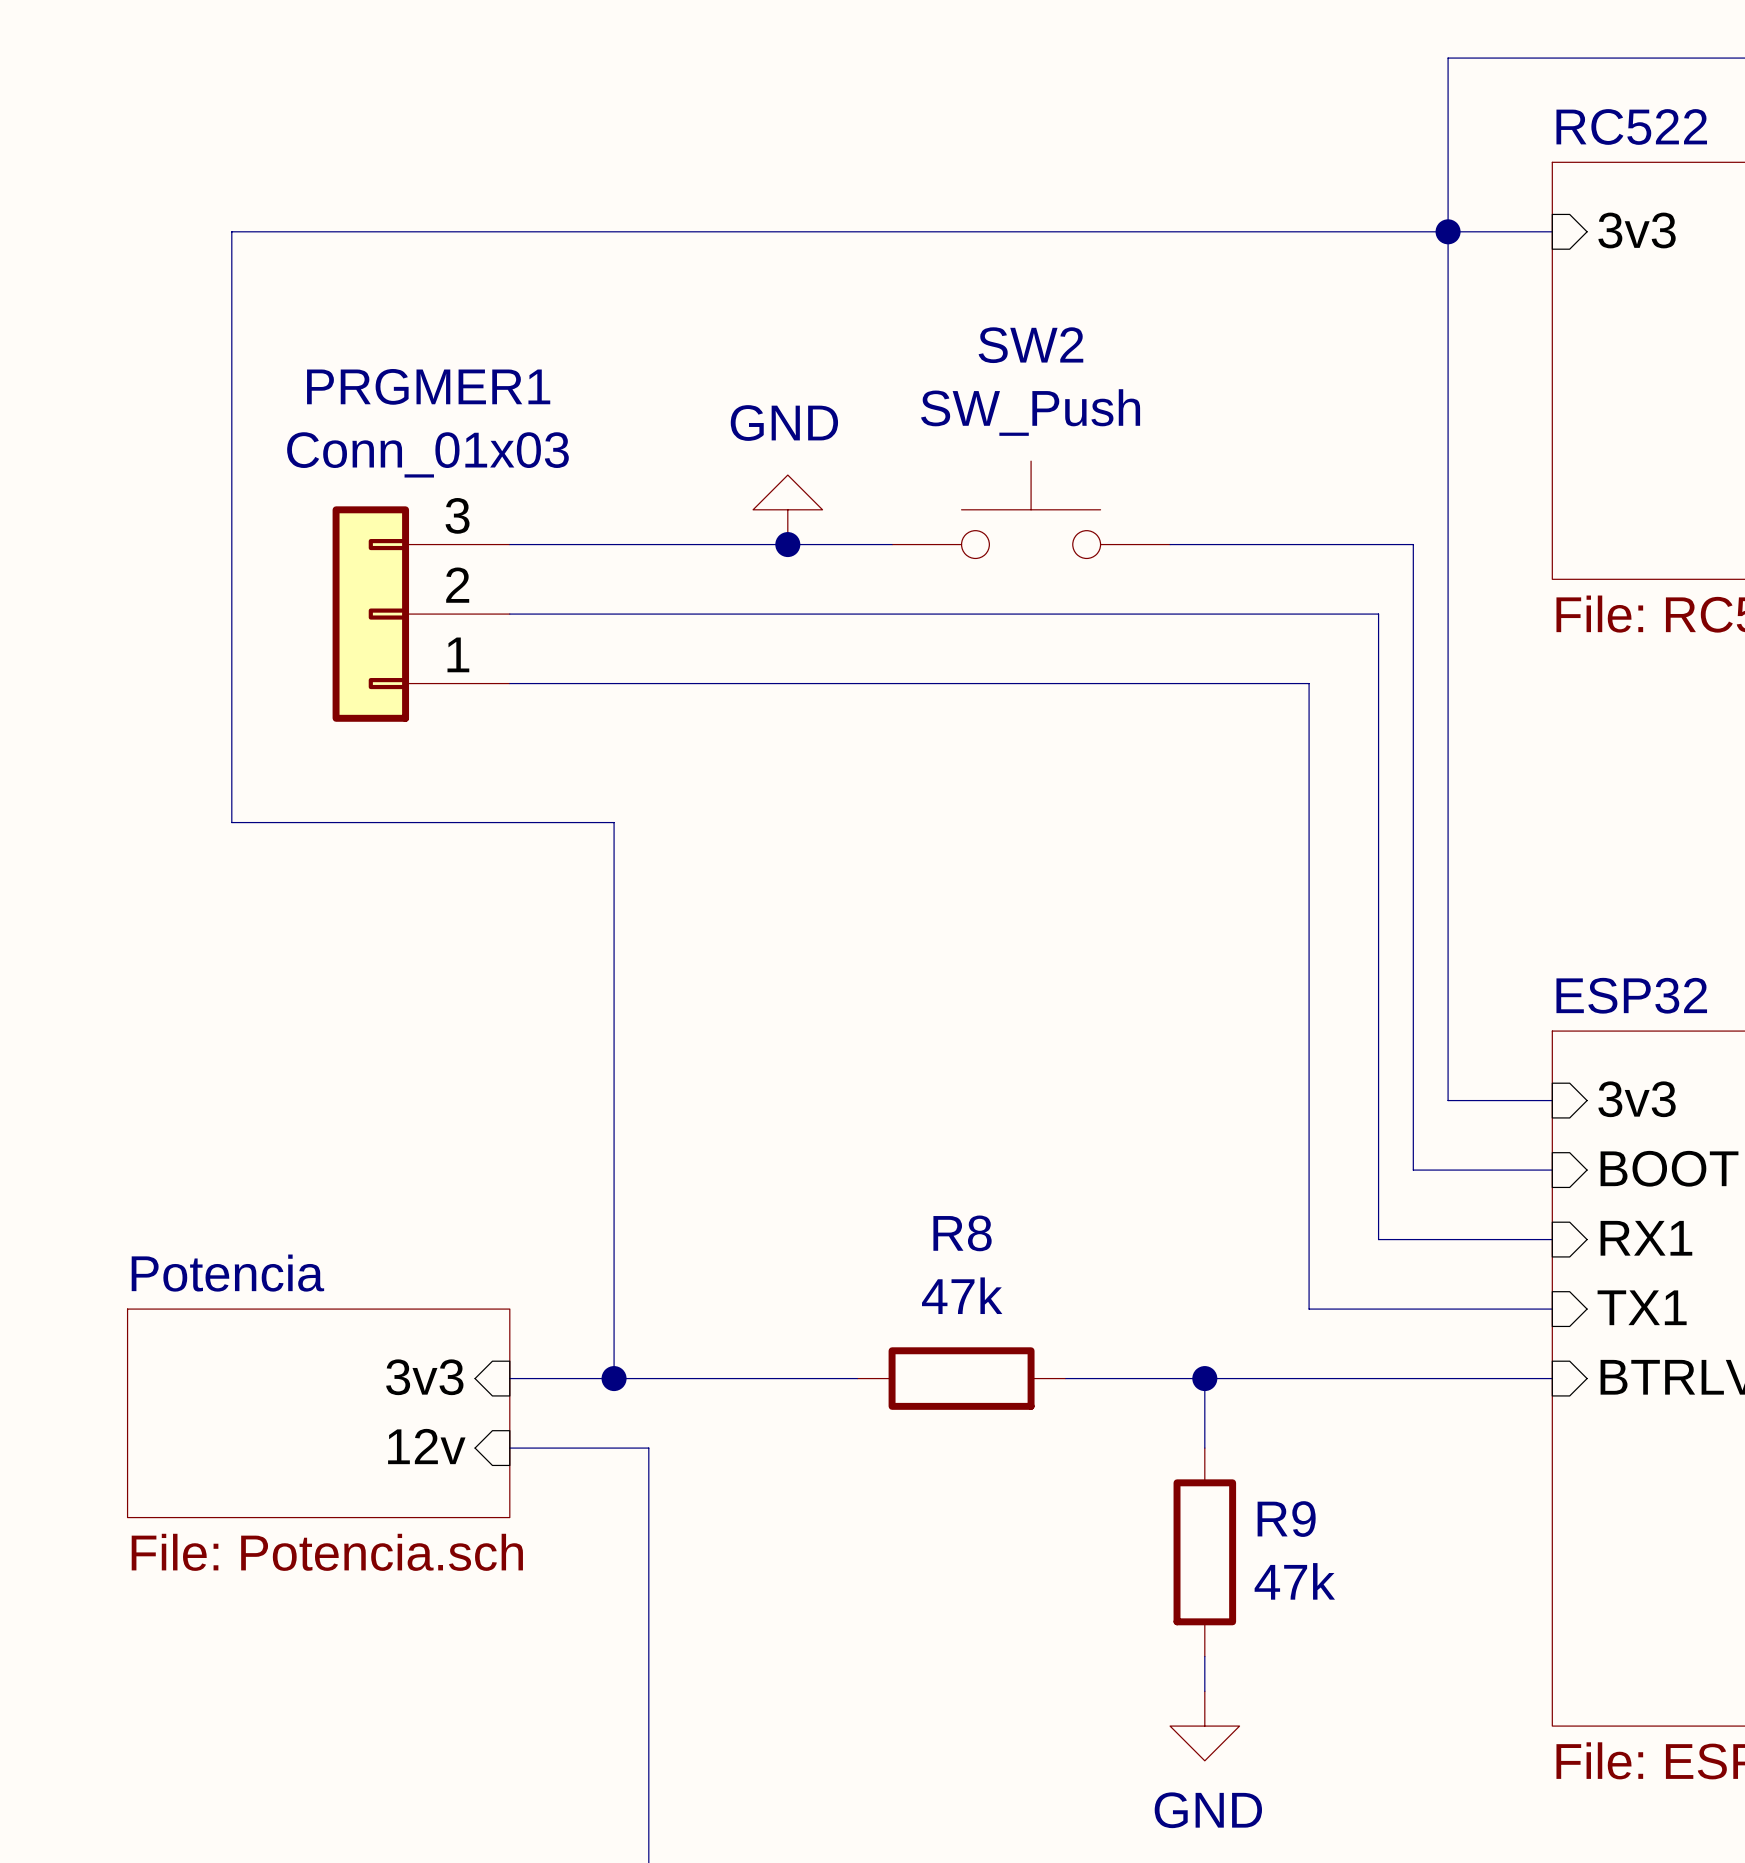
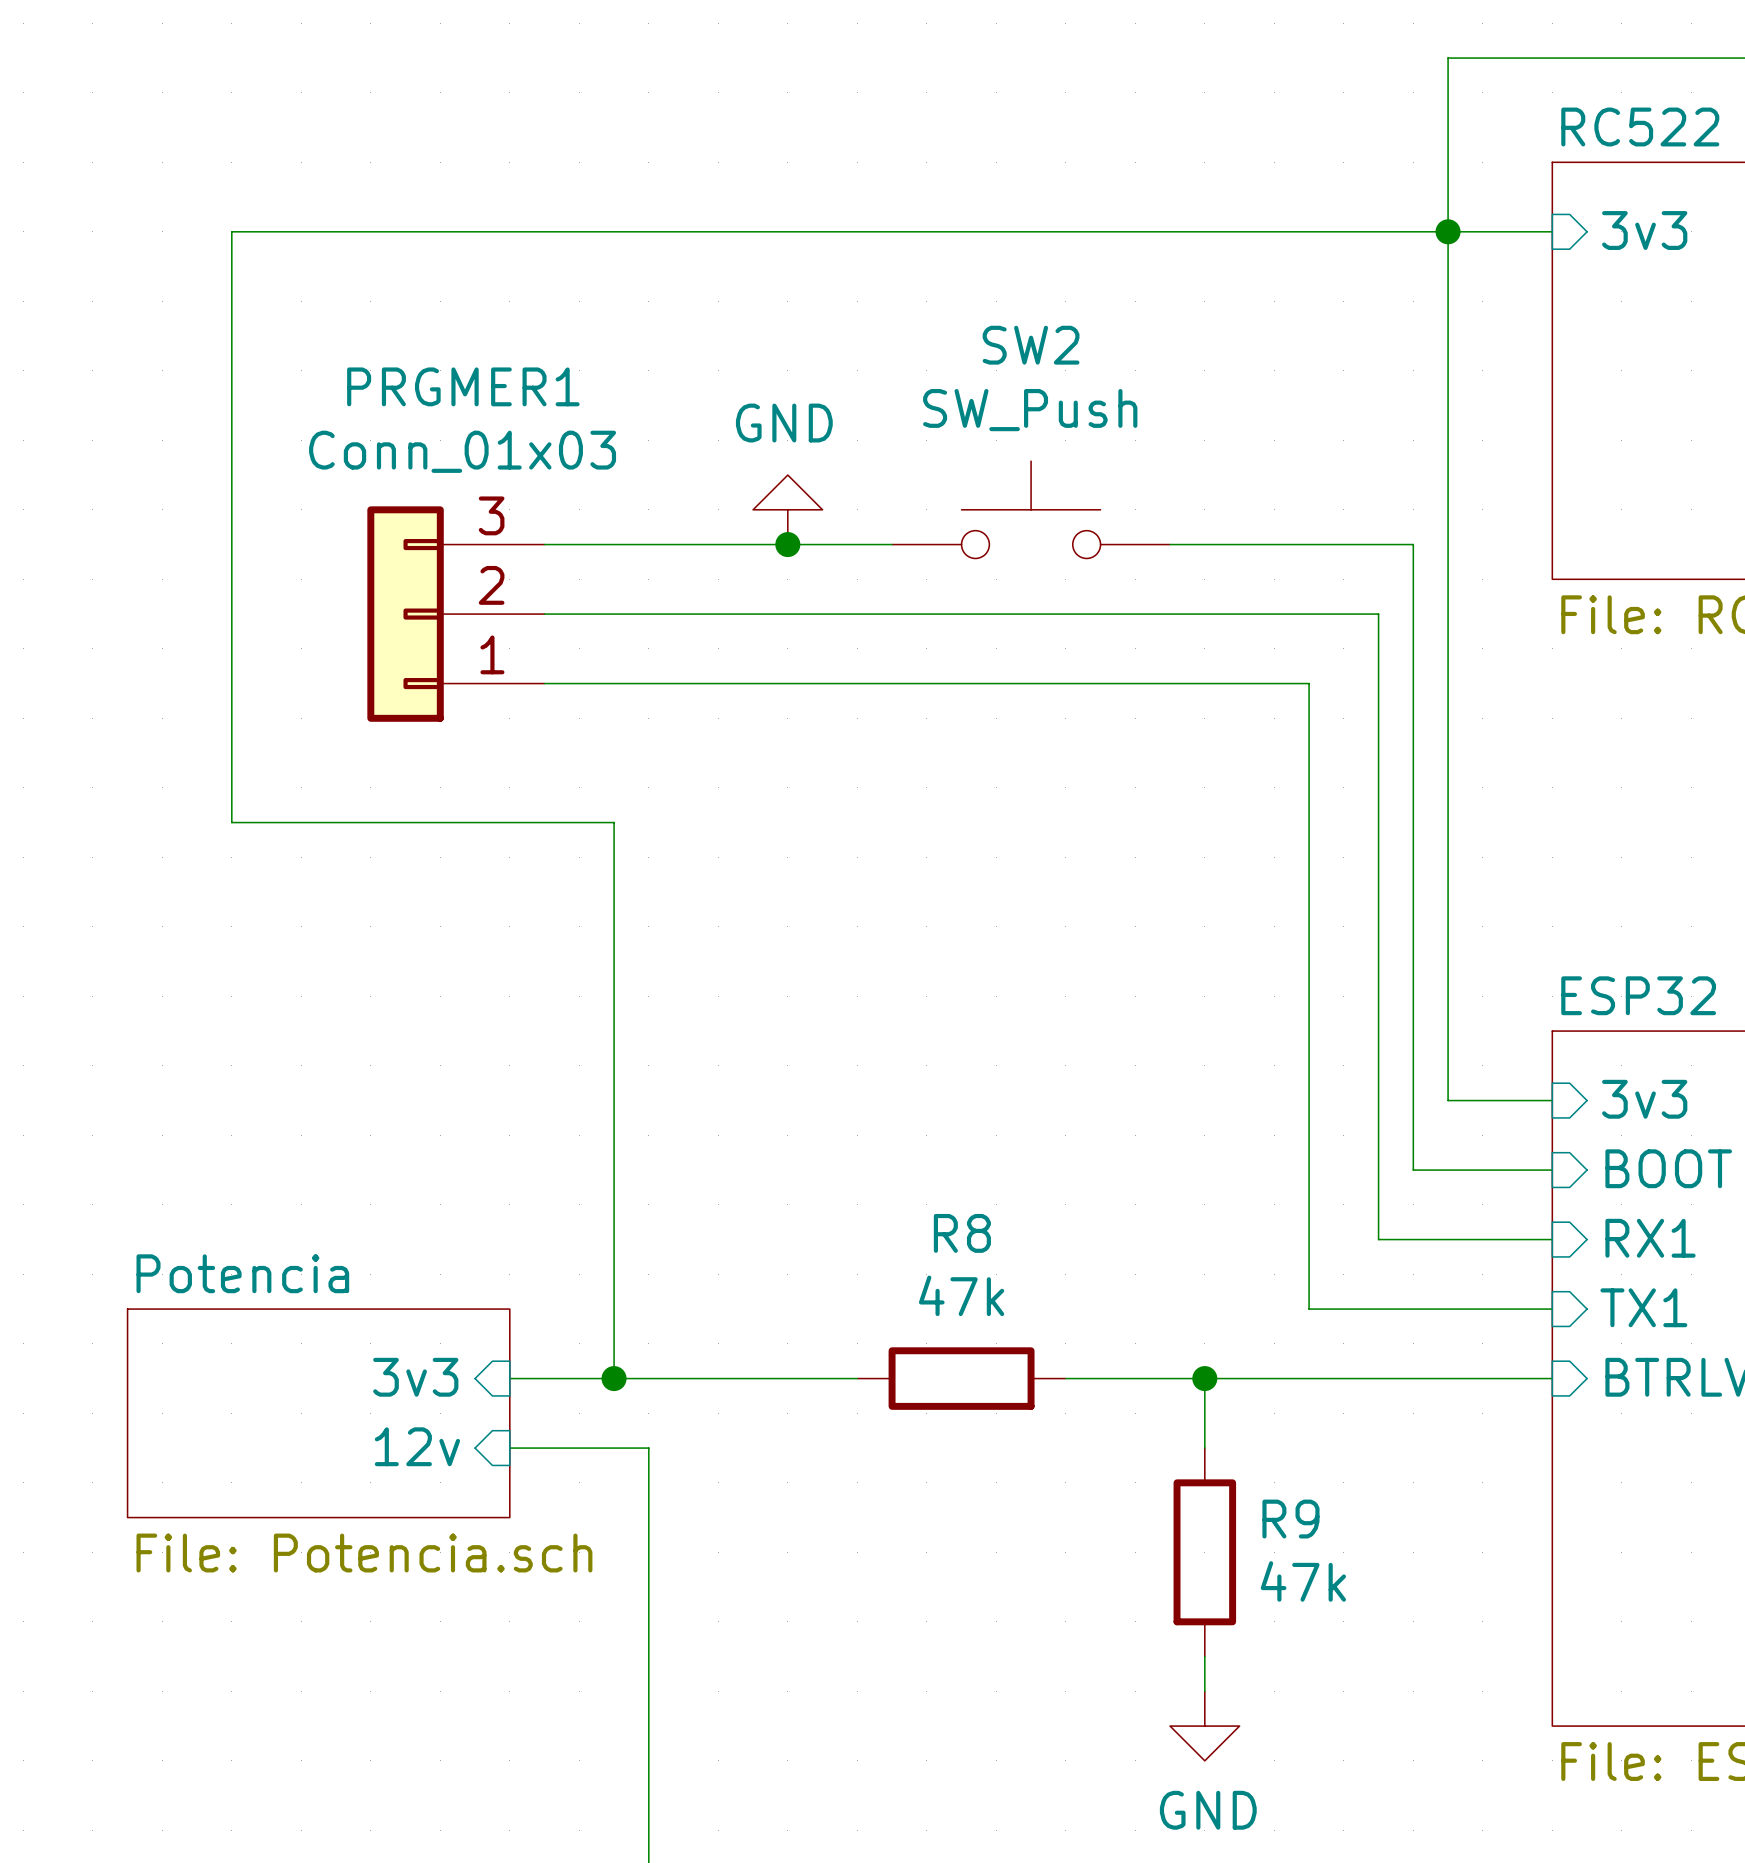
PRGMER1 position: (421, 614) -> (455, 614)

